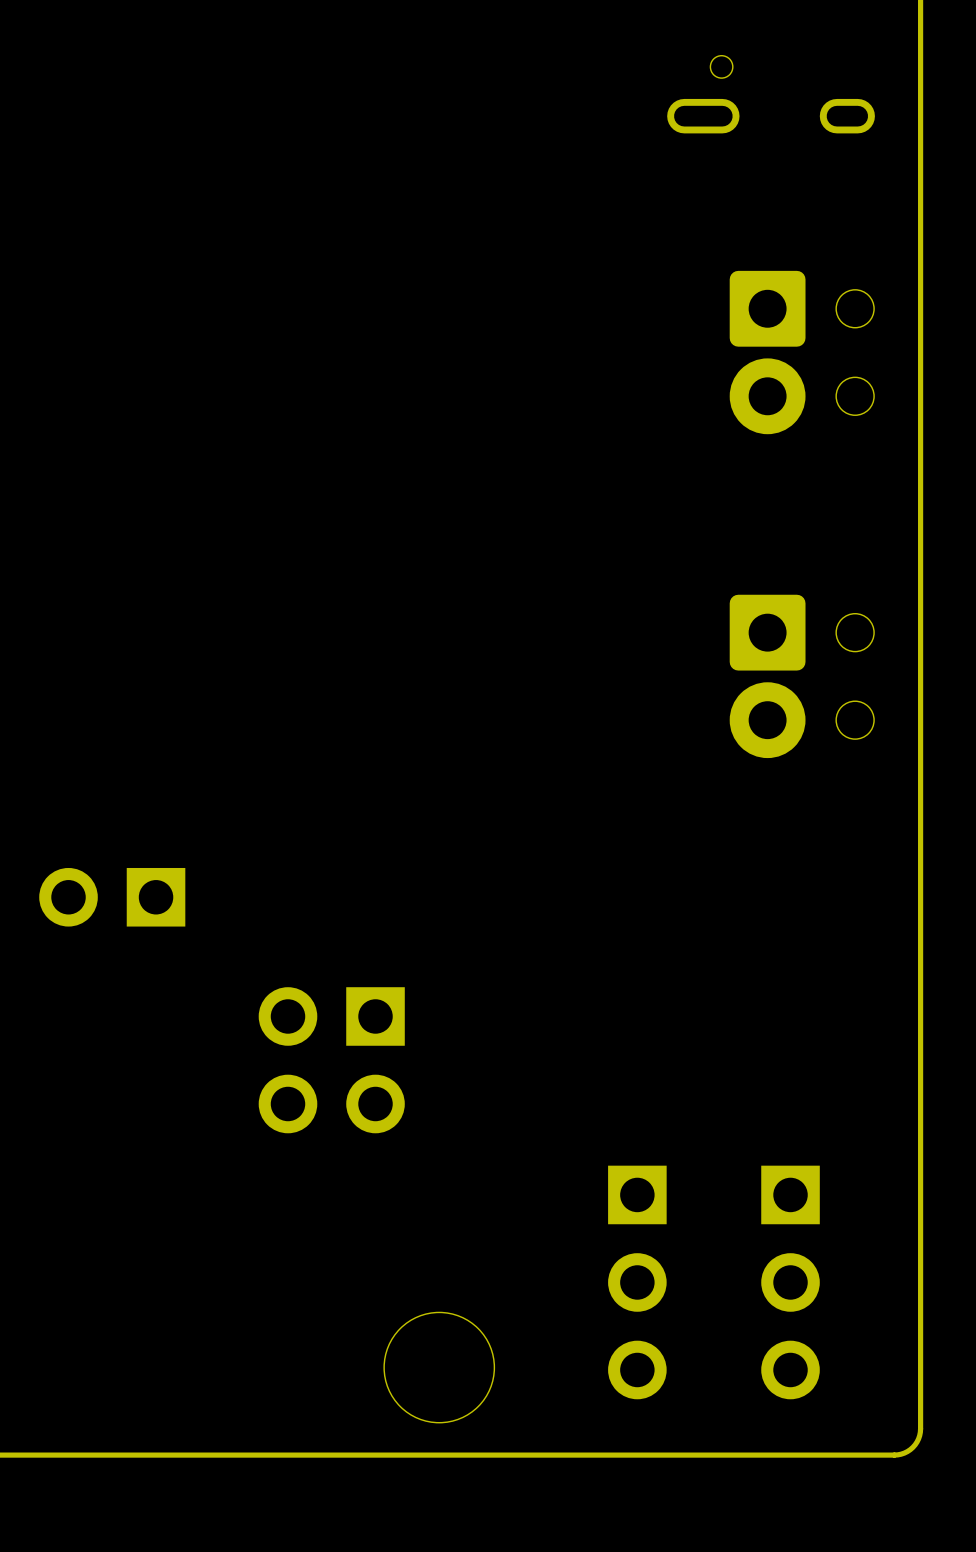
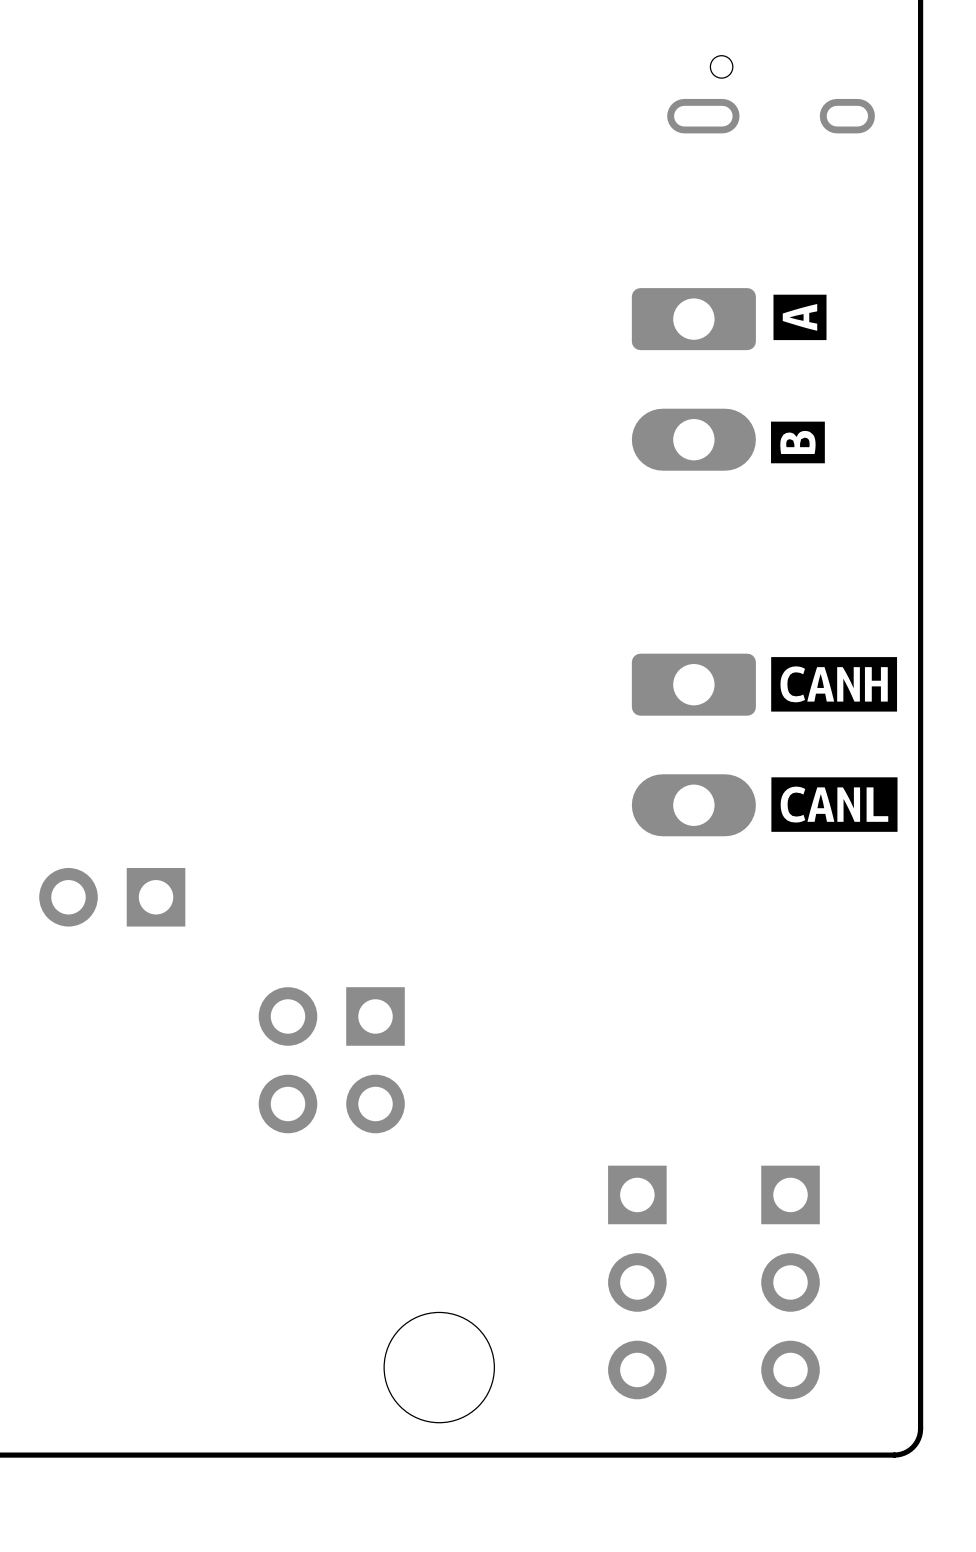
drawing: none -> [773, 294, 827, 341]
part: (801, 352) -> none
part: none -> (693, 379)
drawing: none -> [771, 421, 825, 464]
drawing: none -> [771, 657, 898, 712]
part: (801, 676) -> none
part: none -> (693, 744)
drawing: none -> [771, 777, 898, 832]

